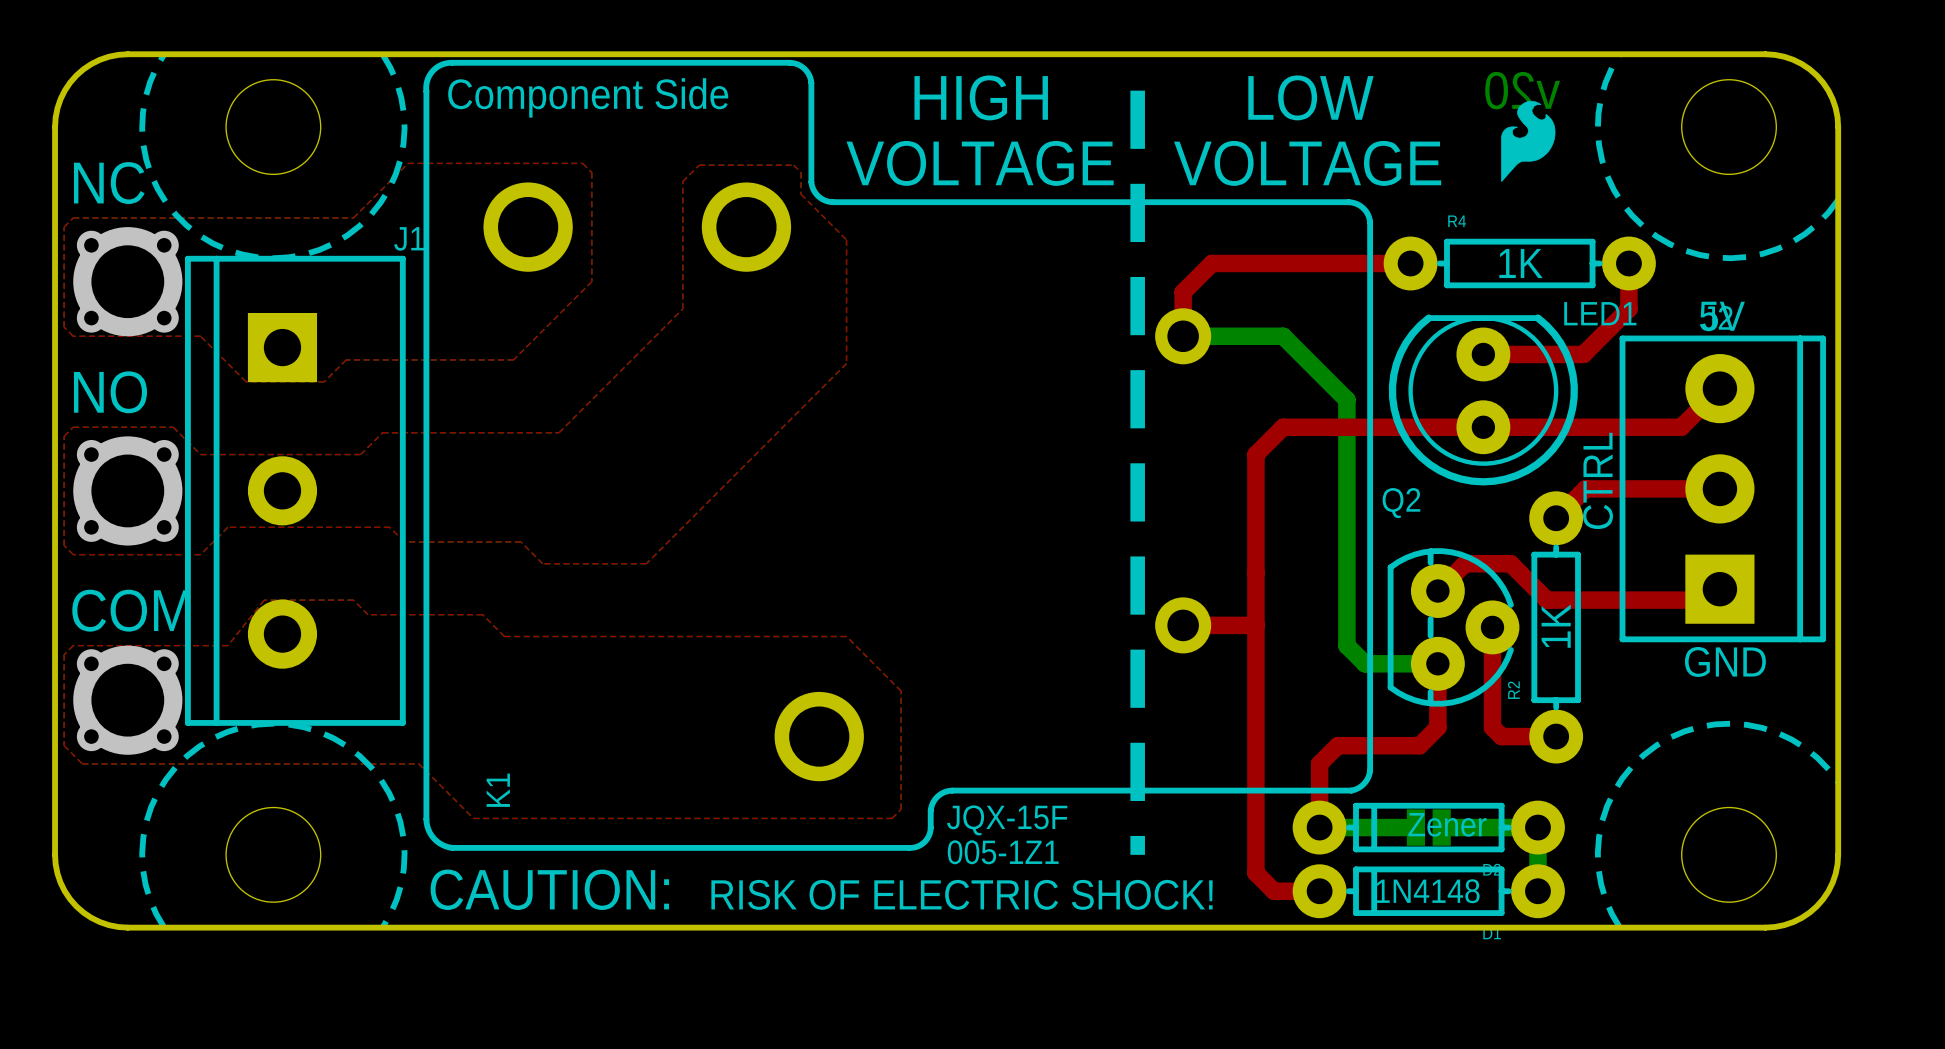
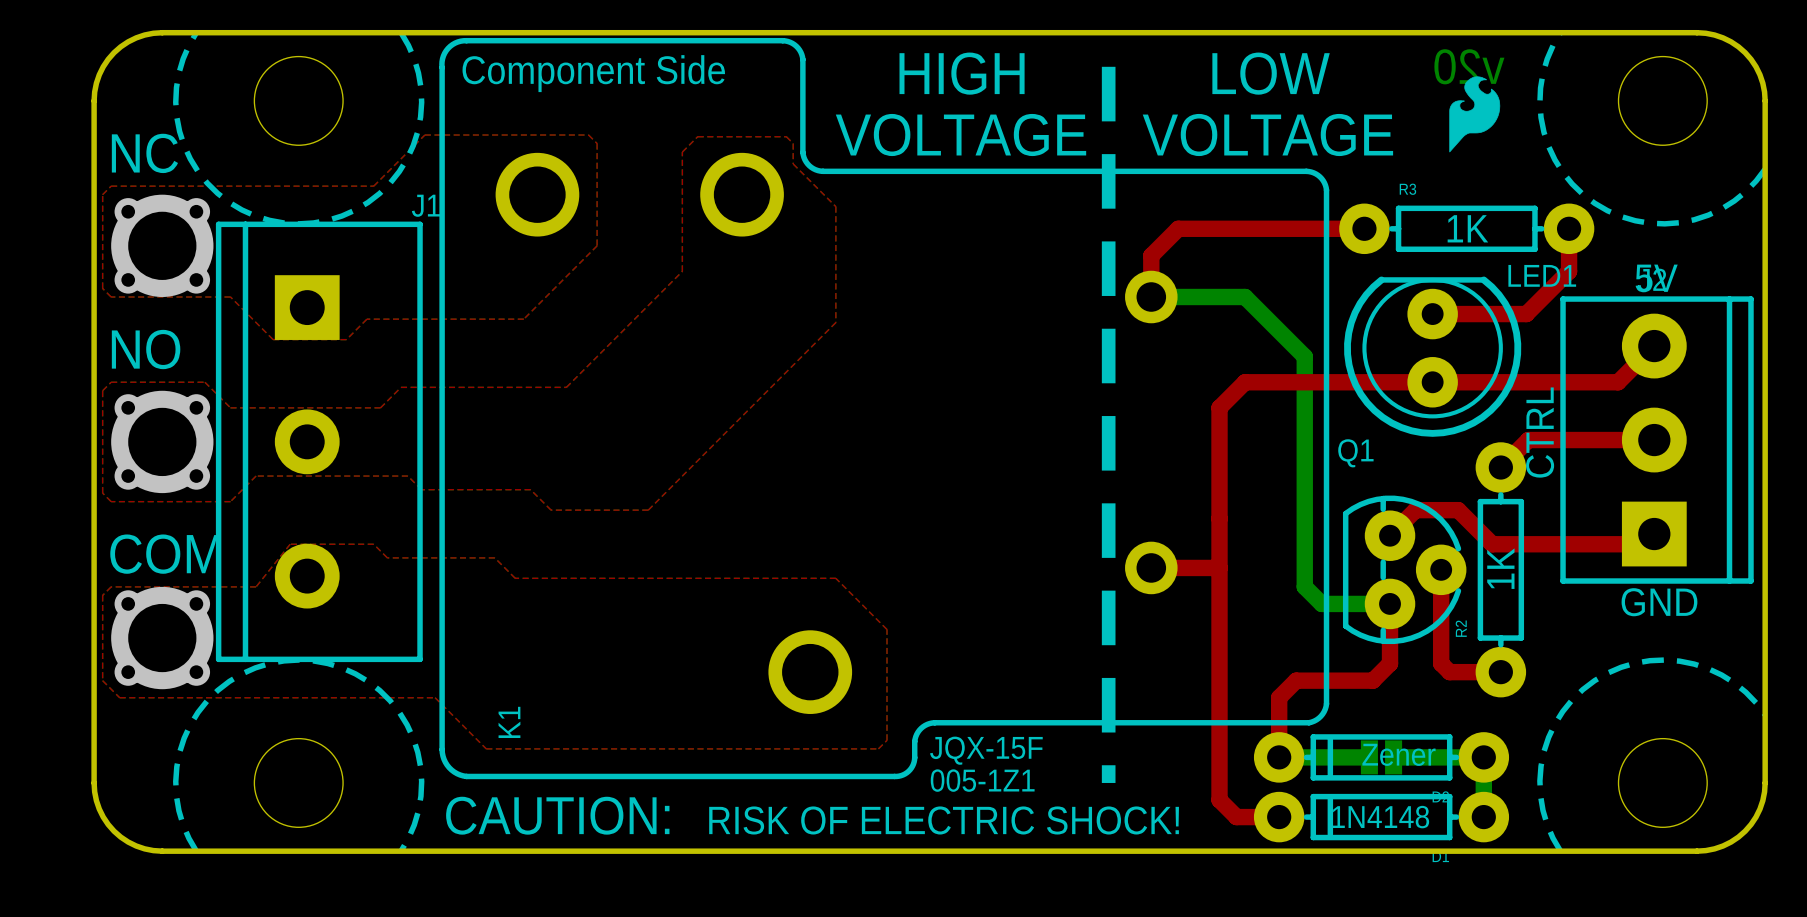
R4 name: R4 (1457, 221) -> R3 (1407, 189)
Q2 name: Q2 (1401, 503) -> Q1 (1355, 453)

